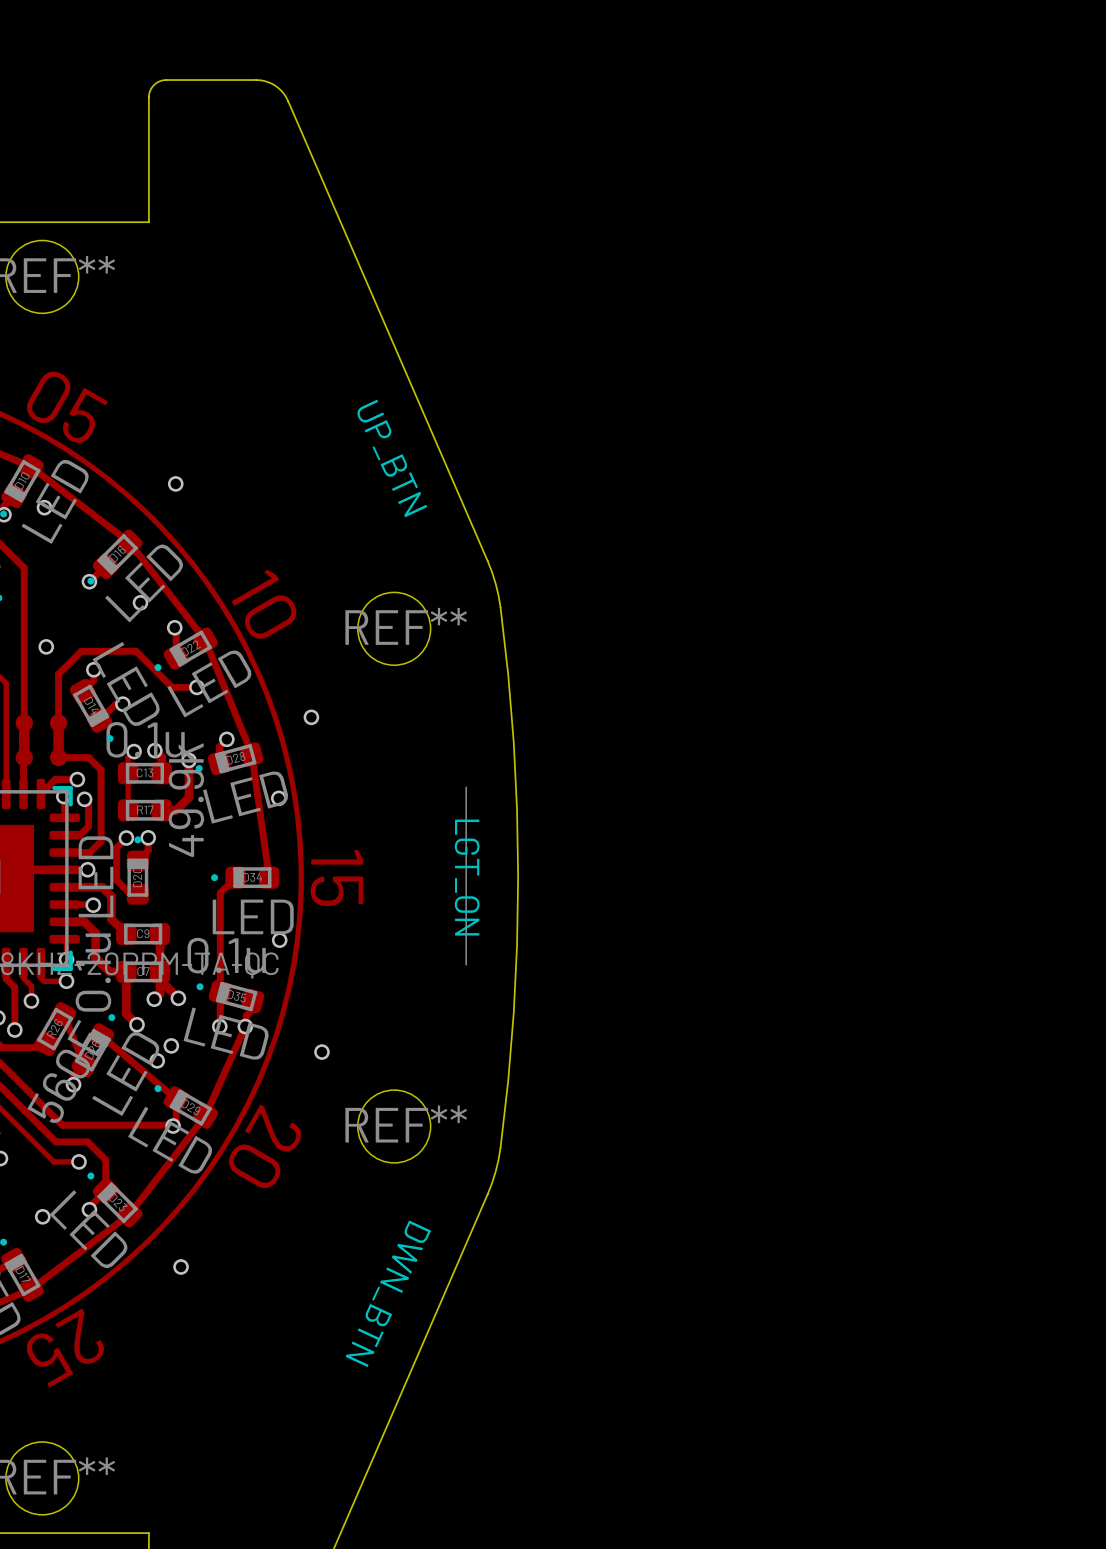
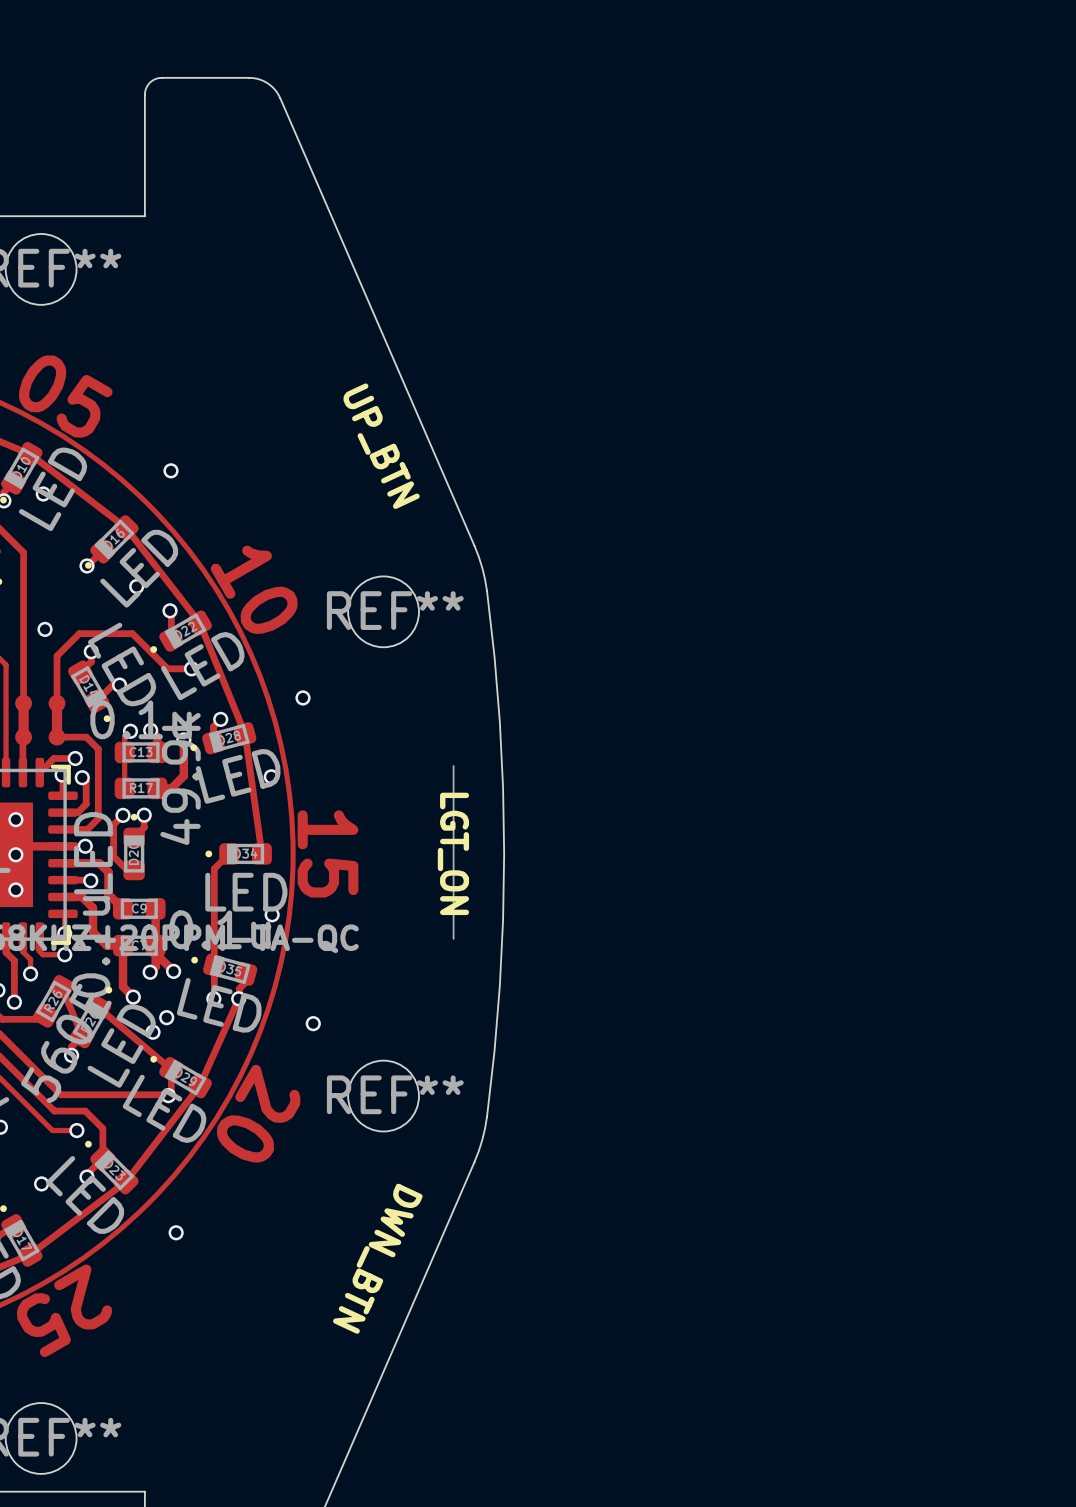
via: none -> (15, 819)
via: none -> (15, 854)
via: none -> (15, 889)

